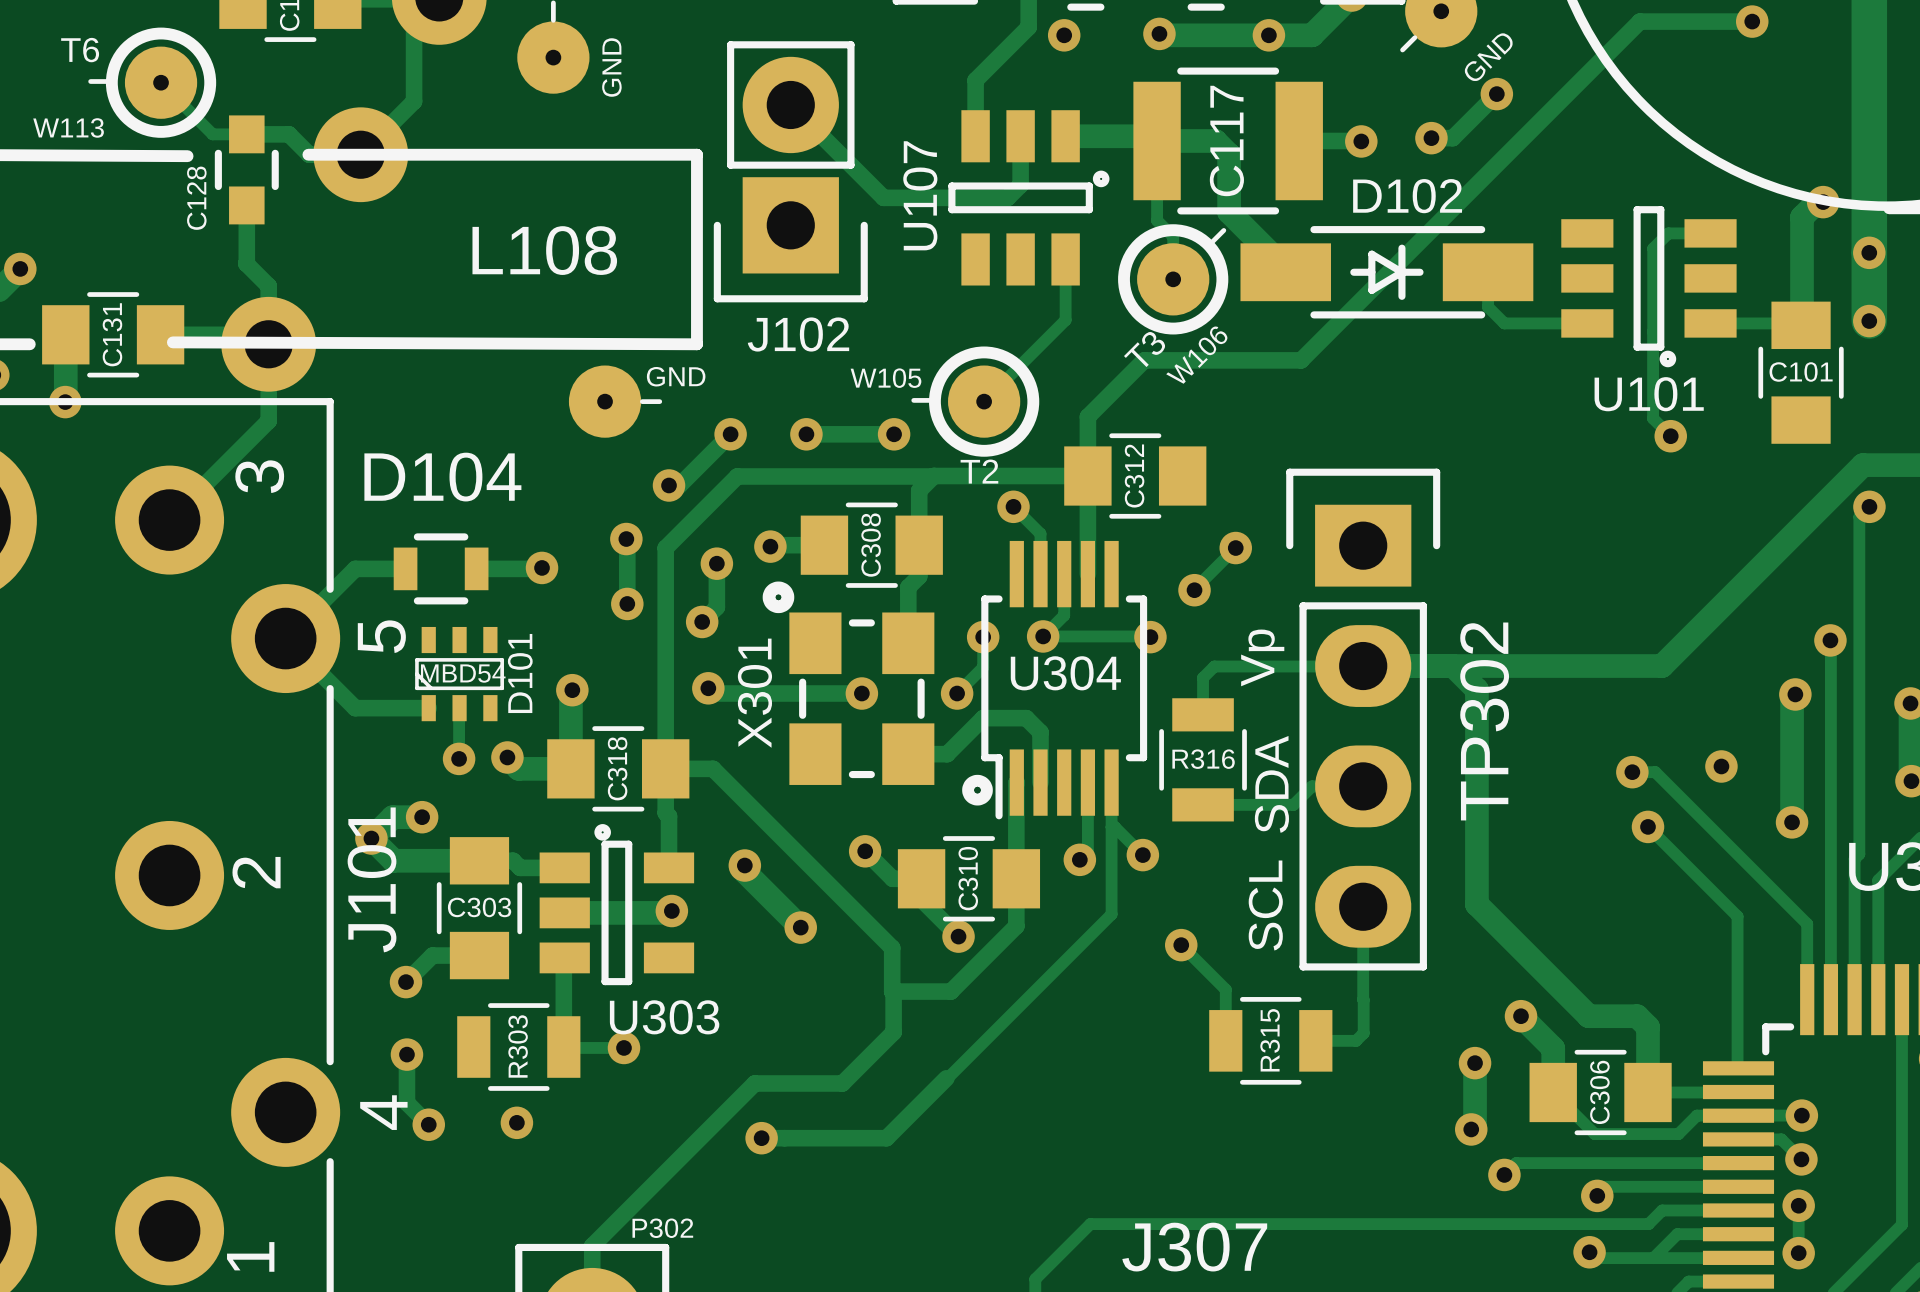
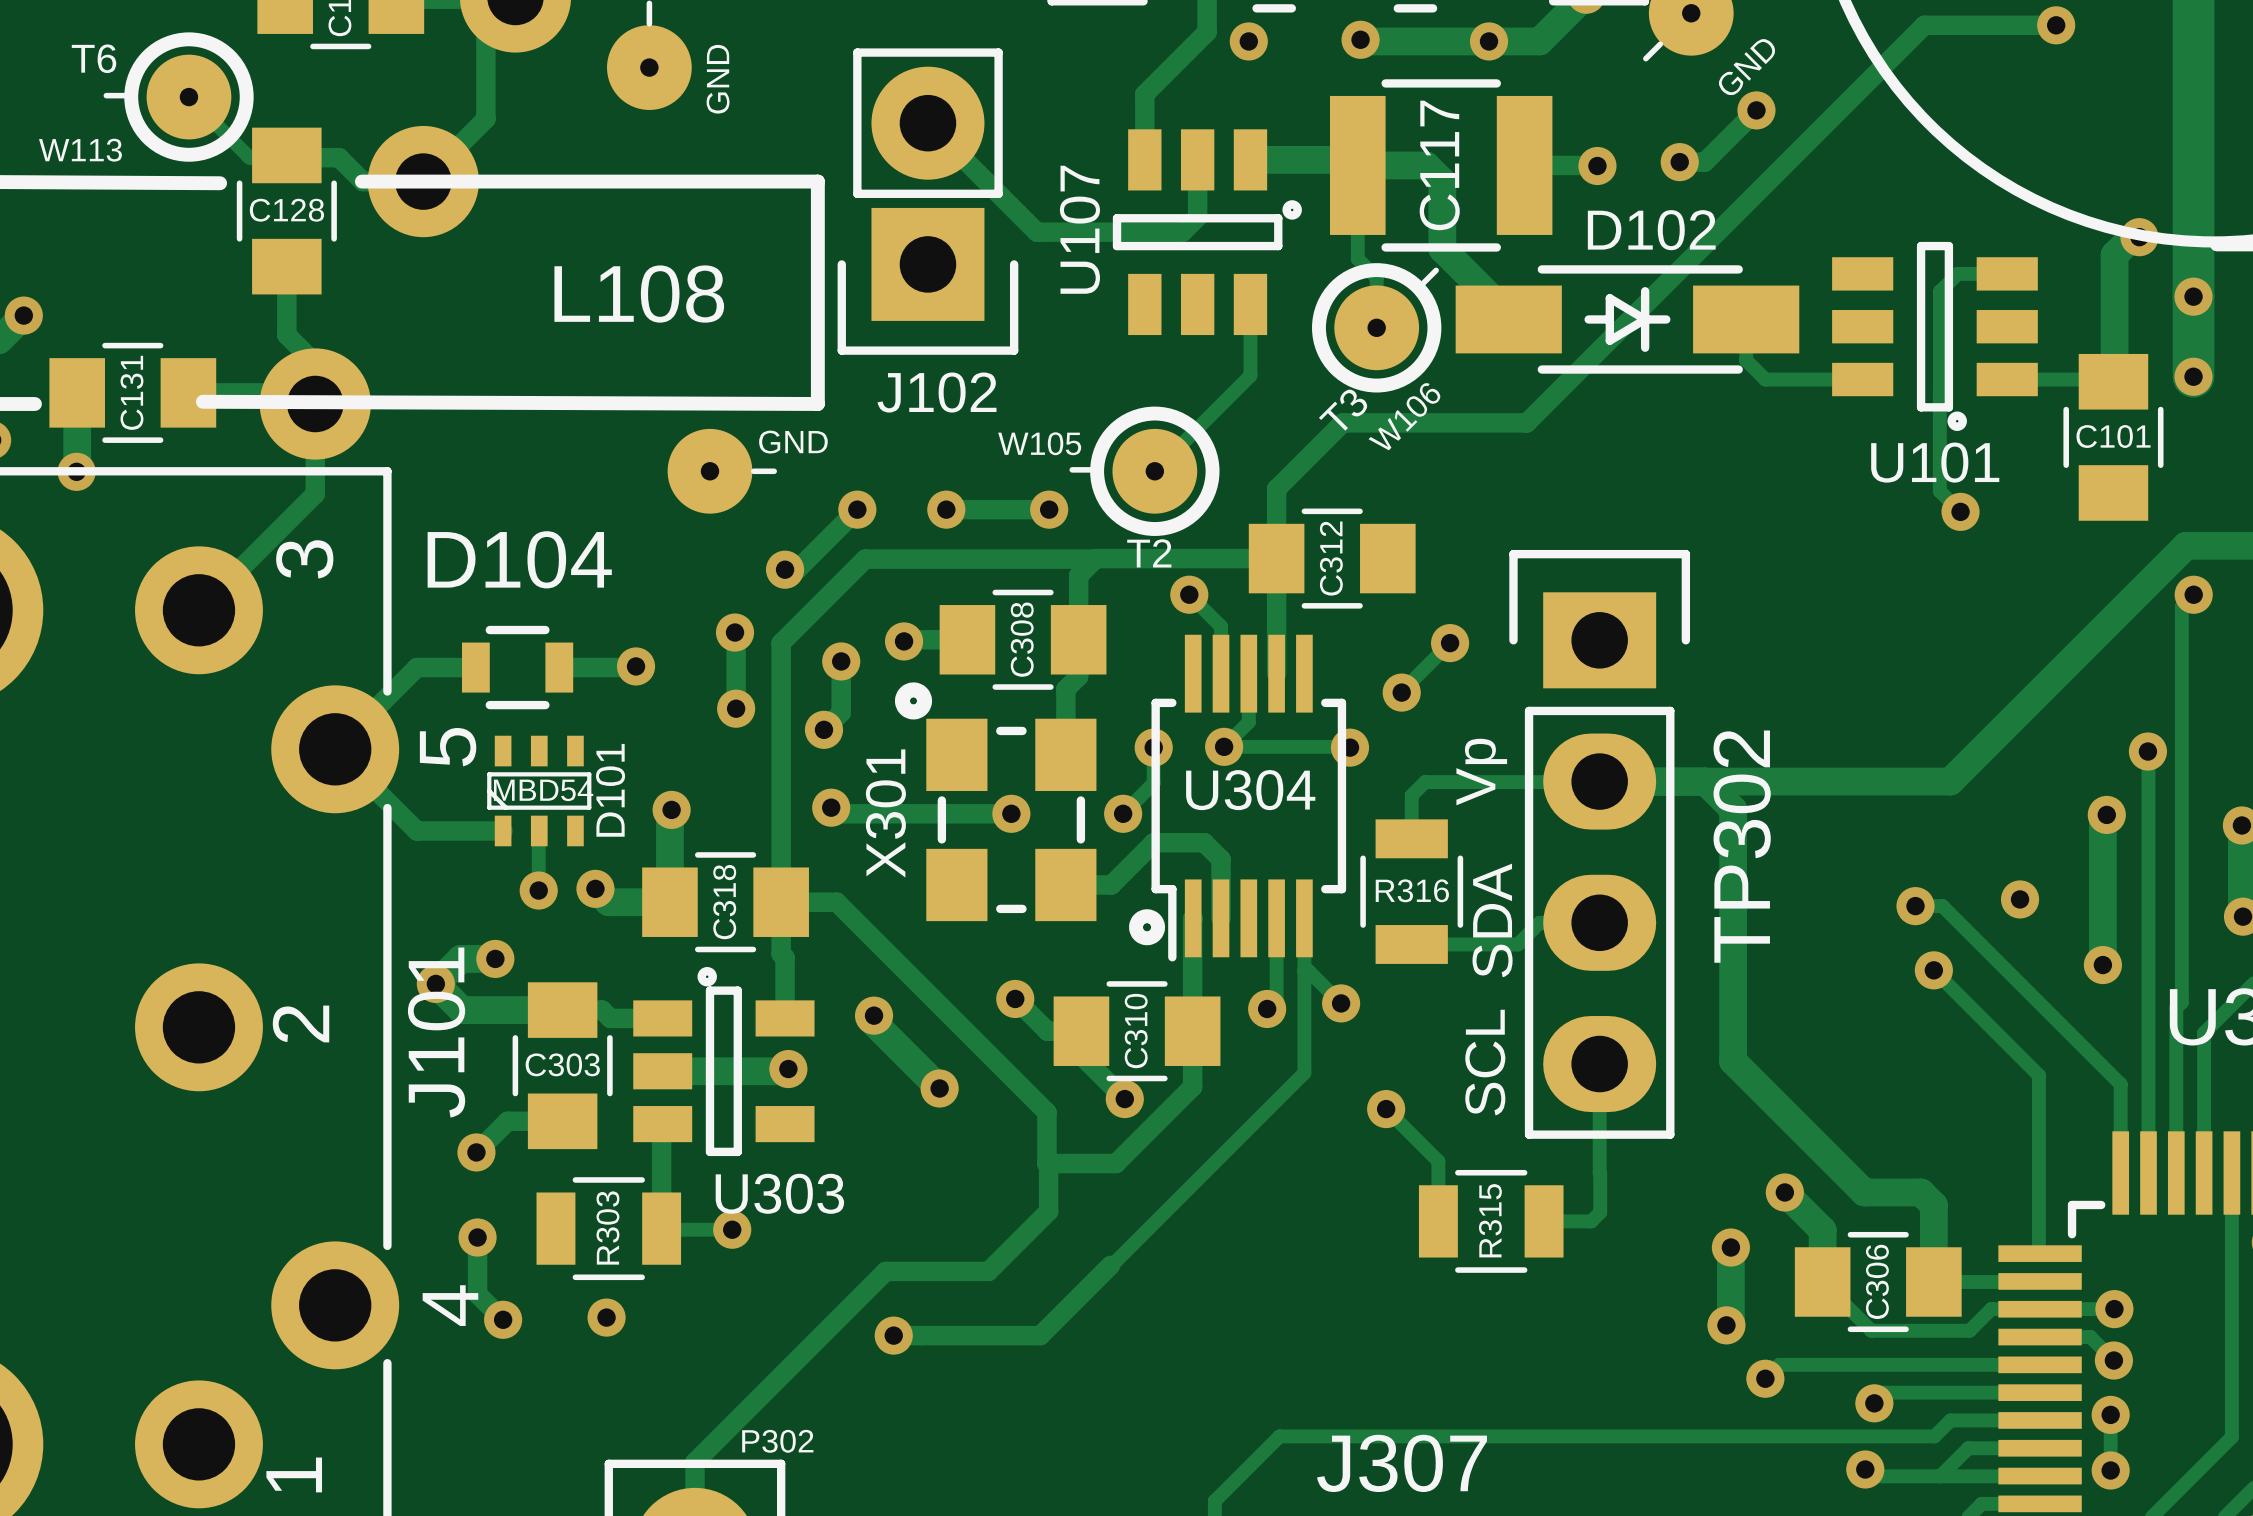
C128 footprint: [214, 115, 279, 225] -> [236, 127, 337, 295]
C128 name rotation: 0° (196, 198) -> 90° clockwise (286, 210)
track: (246, 205) (246, 263) -> none
track: (246, 263) (268, 286) (268, 309) -> (286, 266) (286, 335) (315, 363)

